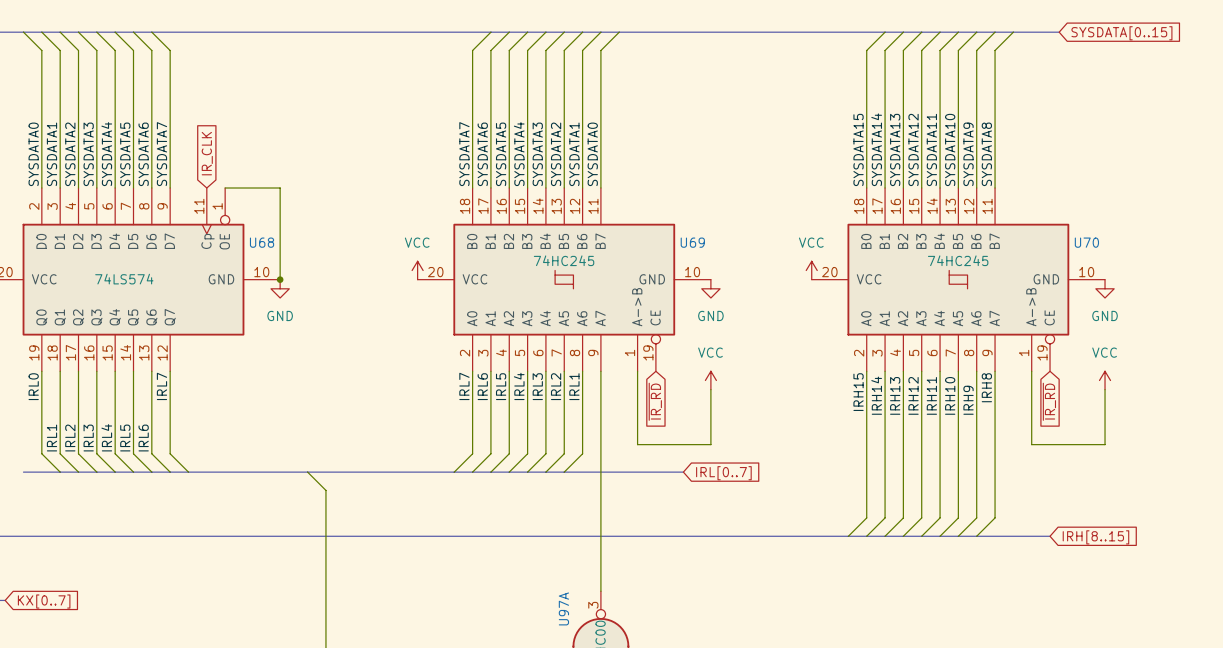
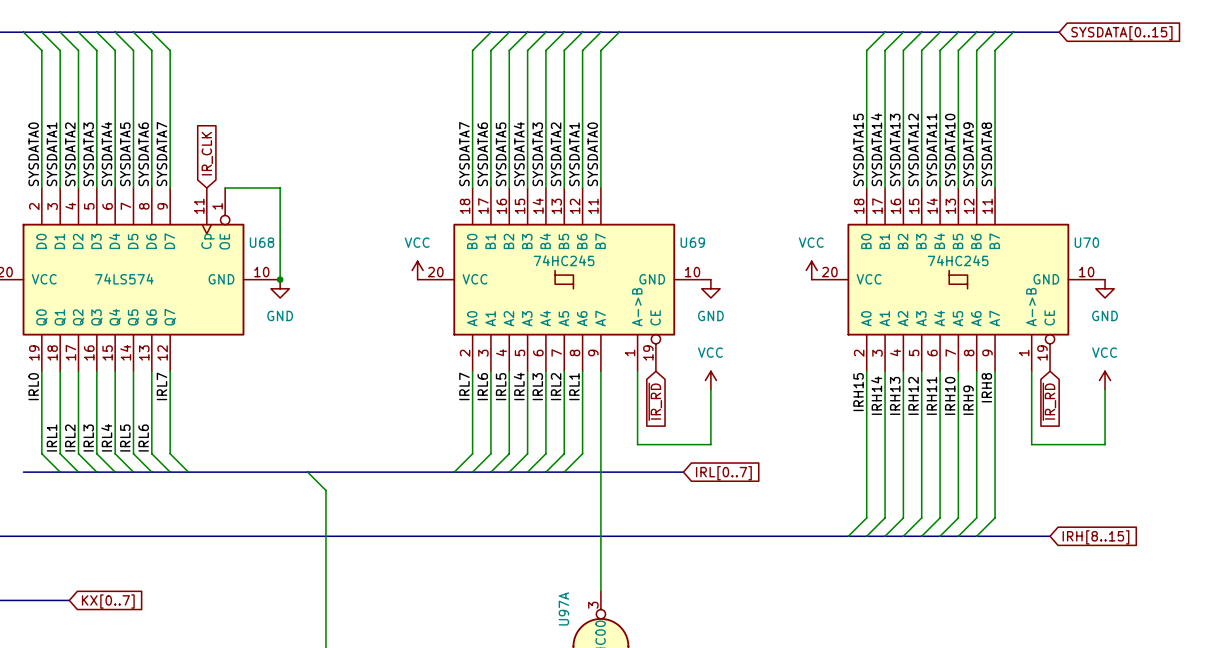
bus: none -> (5, 600) (69, 600)
global label position: KX[0..7] (44, 601) -> KX[0..7] (108, 601)

